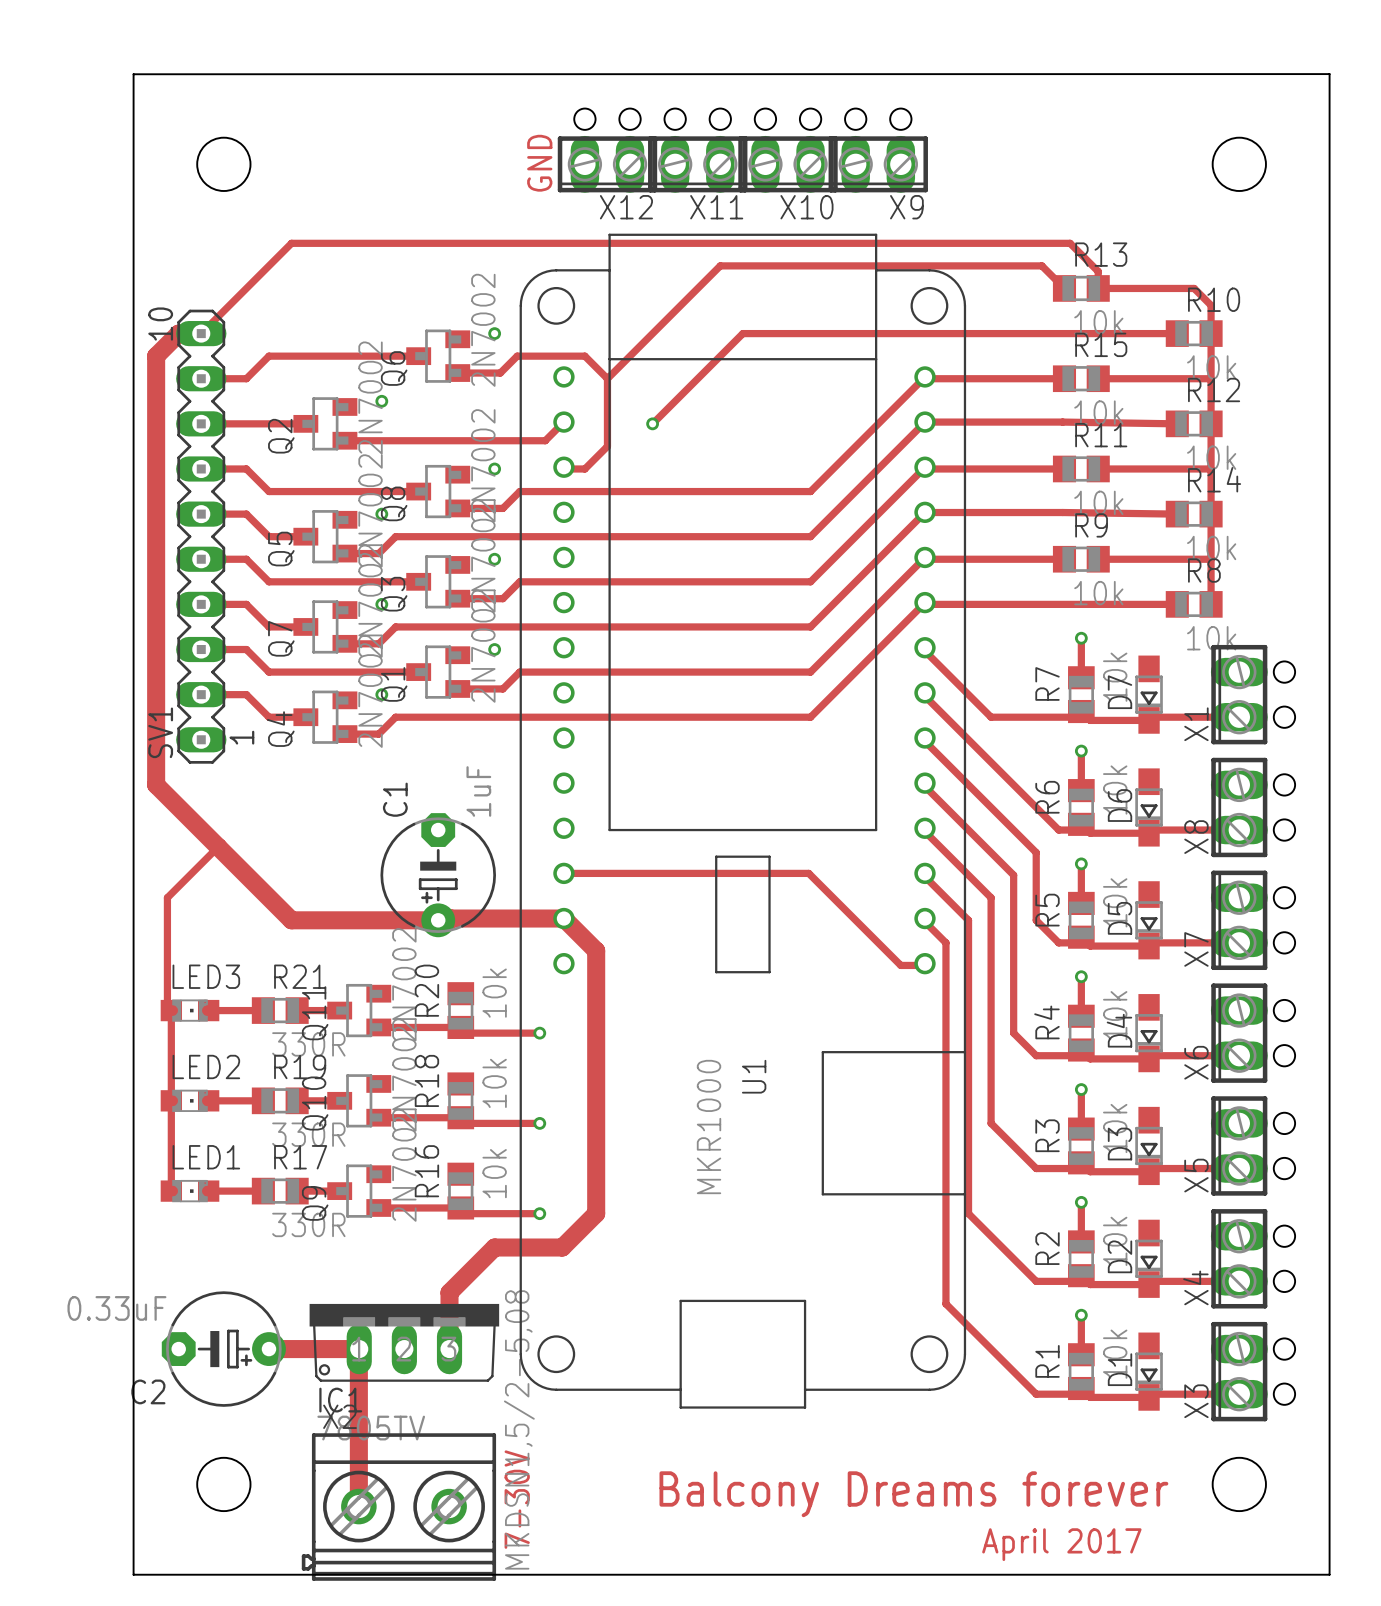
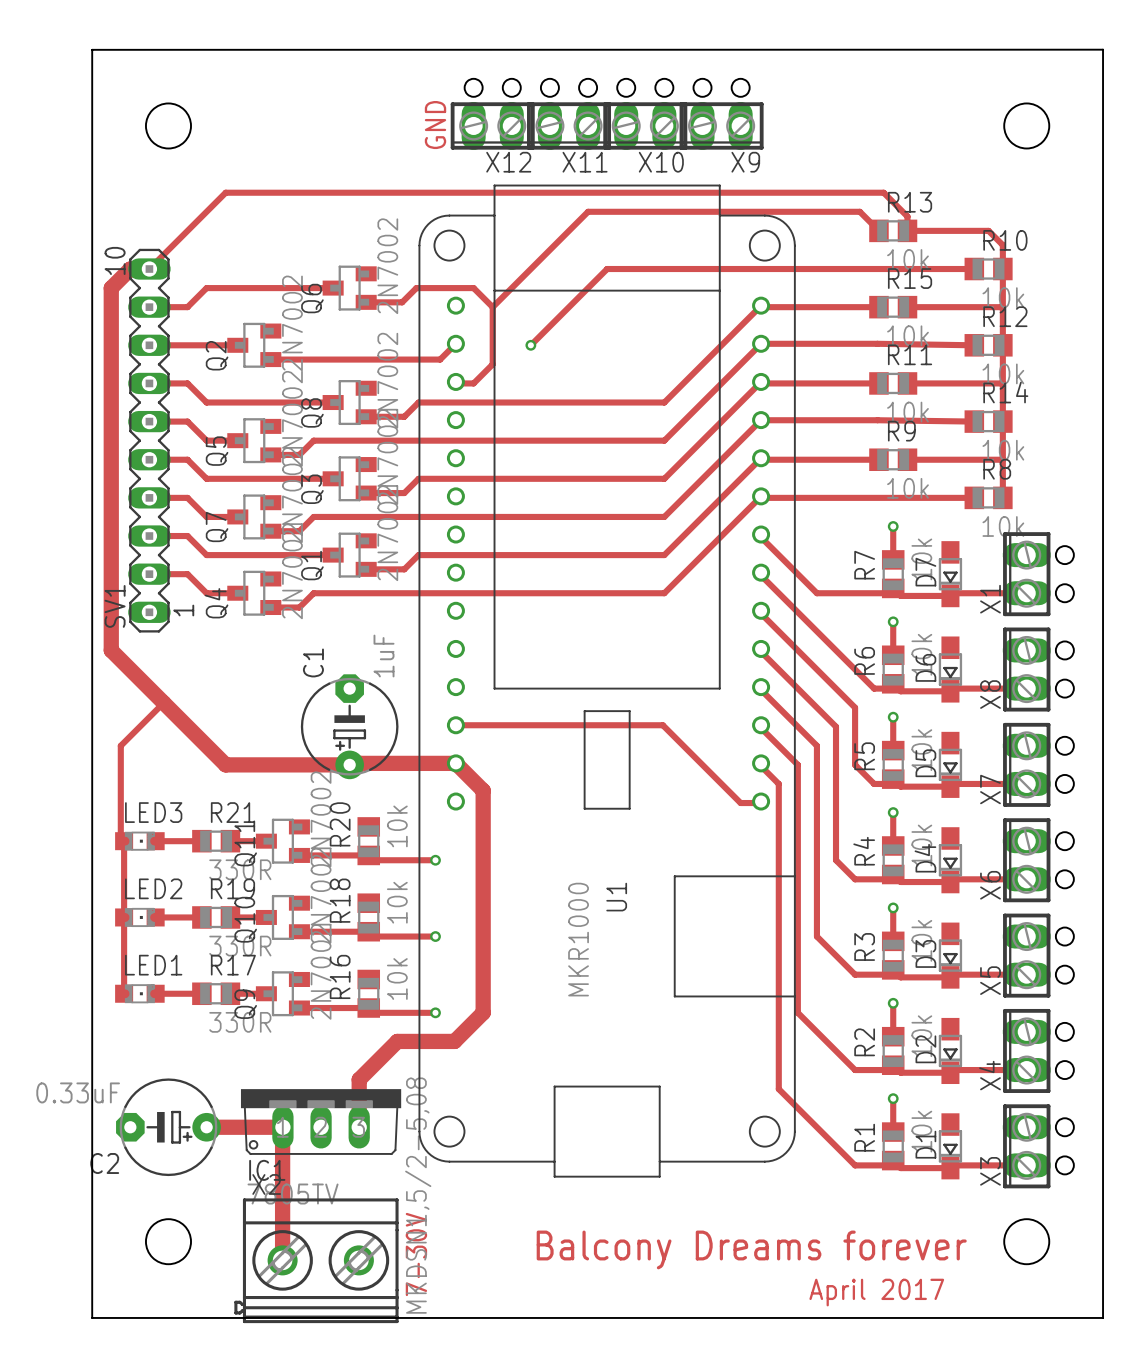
via: (494, 333) -> none
via: (381, 401) -> none
via: (494, 468) -> none
via: (381, 514) -> none
via: (494, 559) -> none
via: (381, 604) -> none
via: (494, 649) -> none
via: (381, 694) -> none

